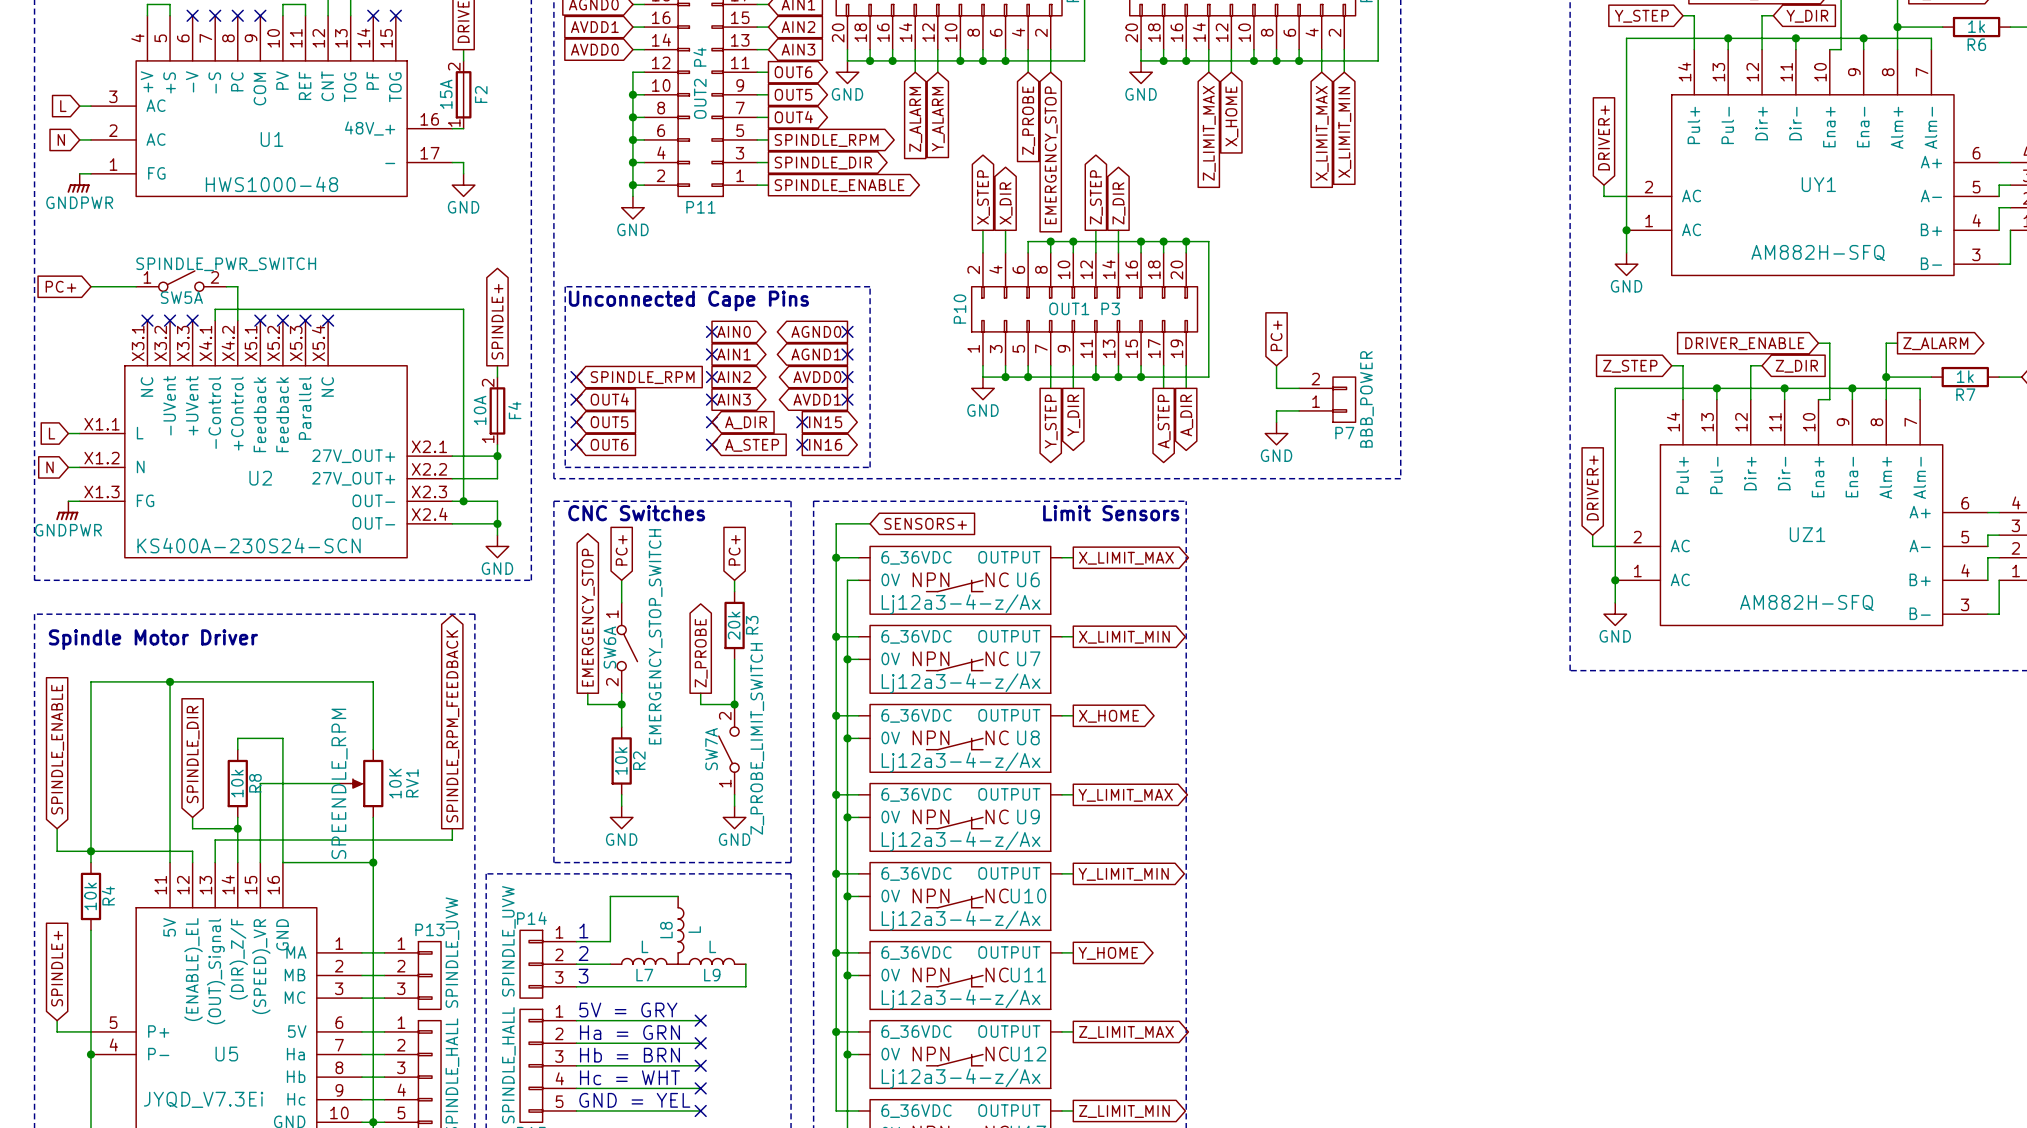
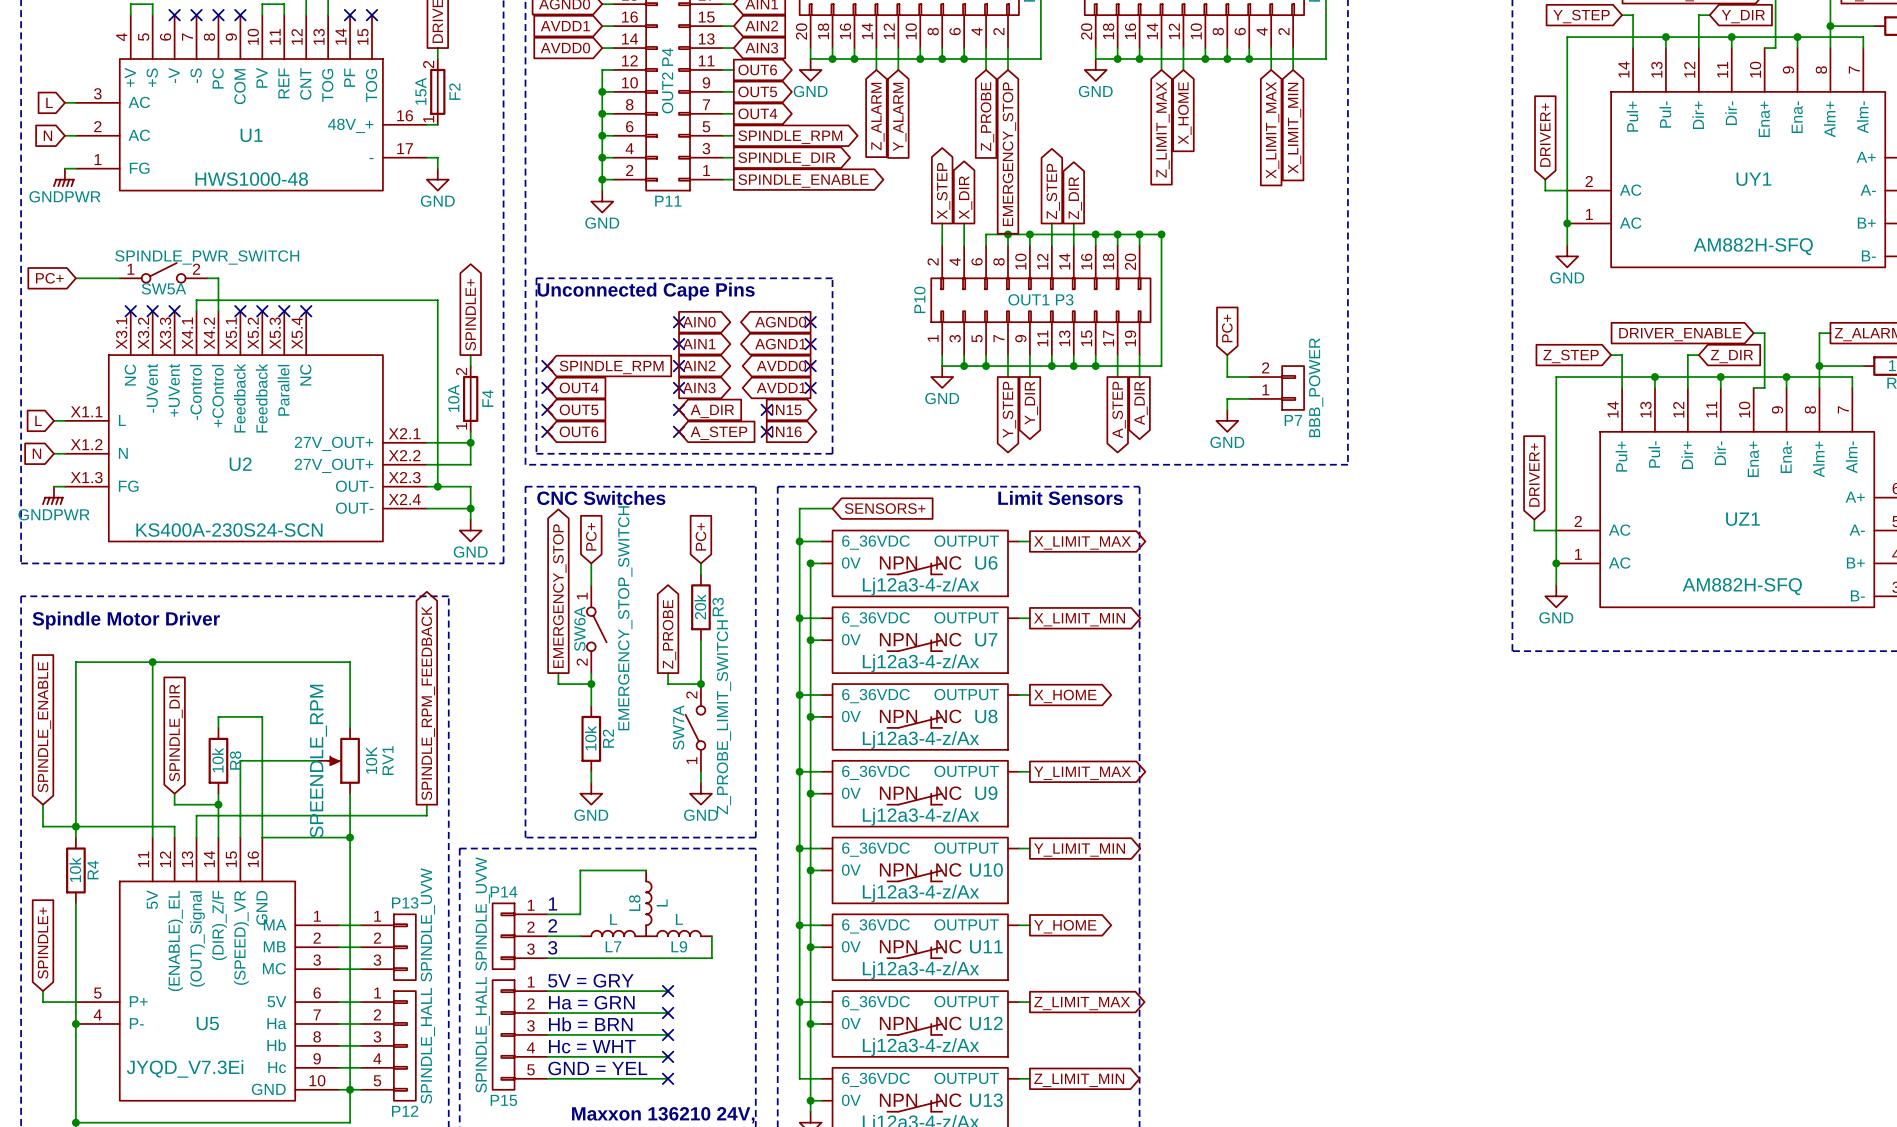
junction: none -> (1161, 234)
junction: none -> (810, 563)

